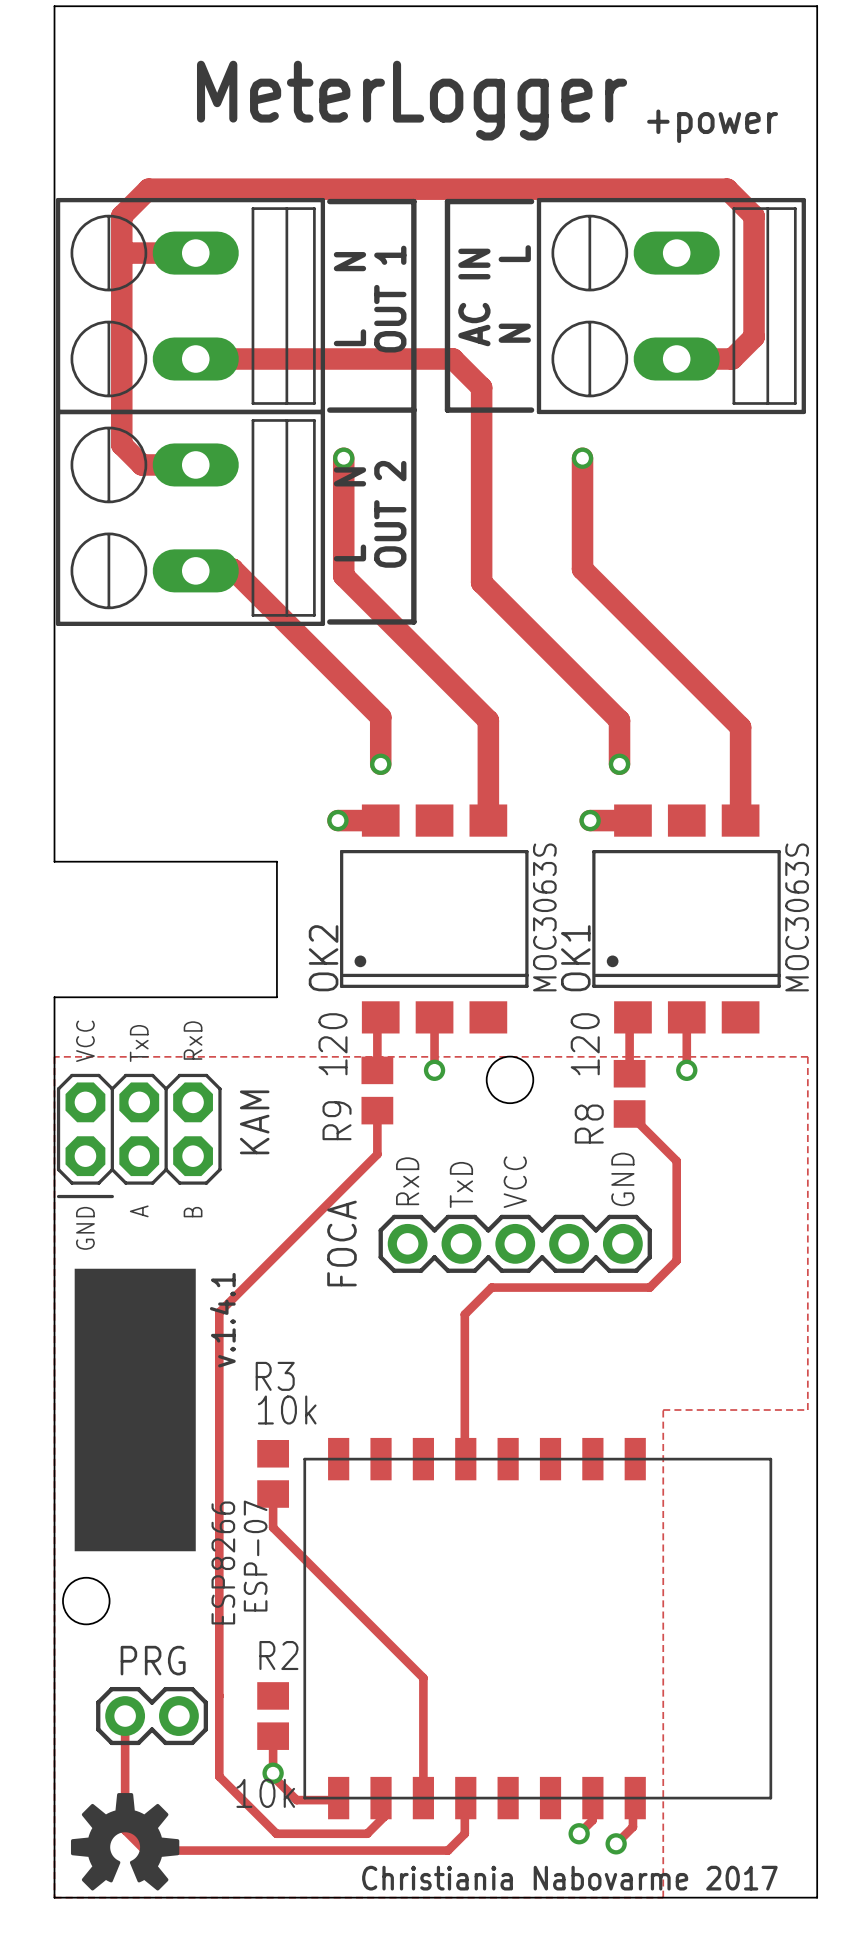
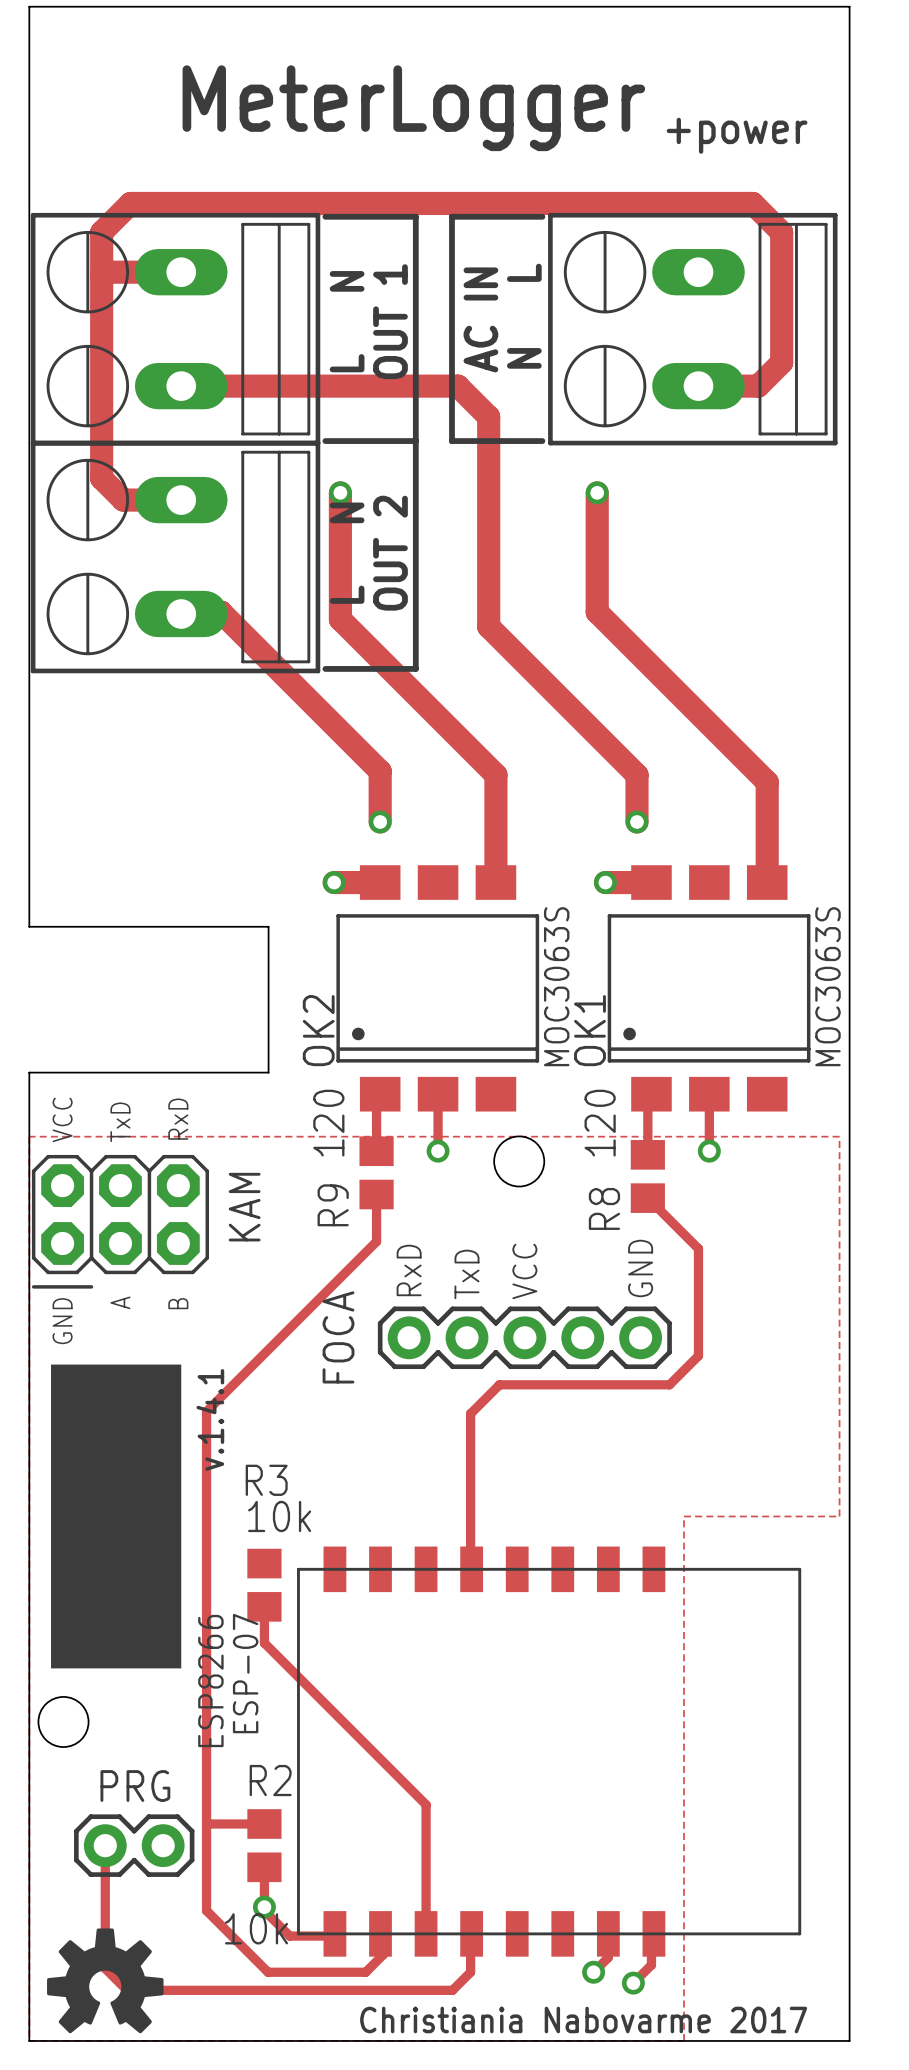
track: none -> (206, 1824) (264, 1824)

